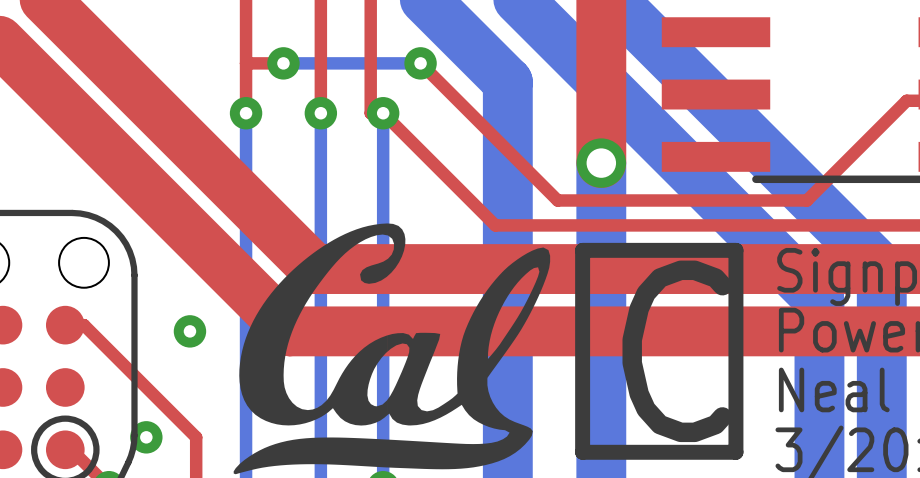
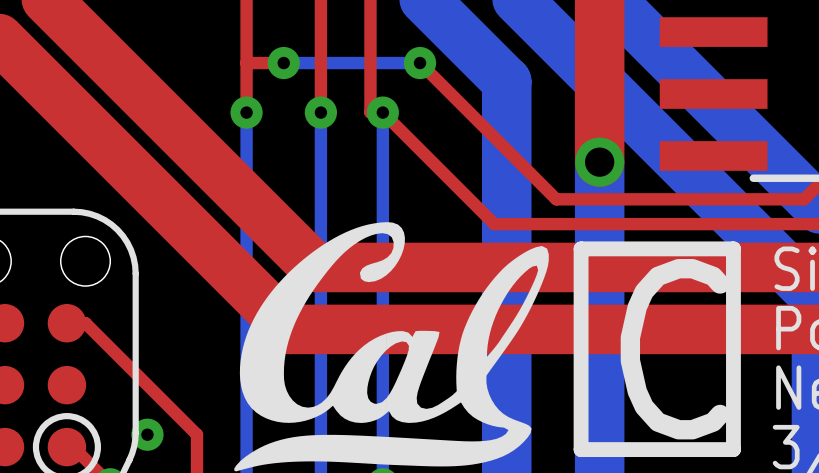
via: (189, 331) -> none

